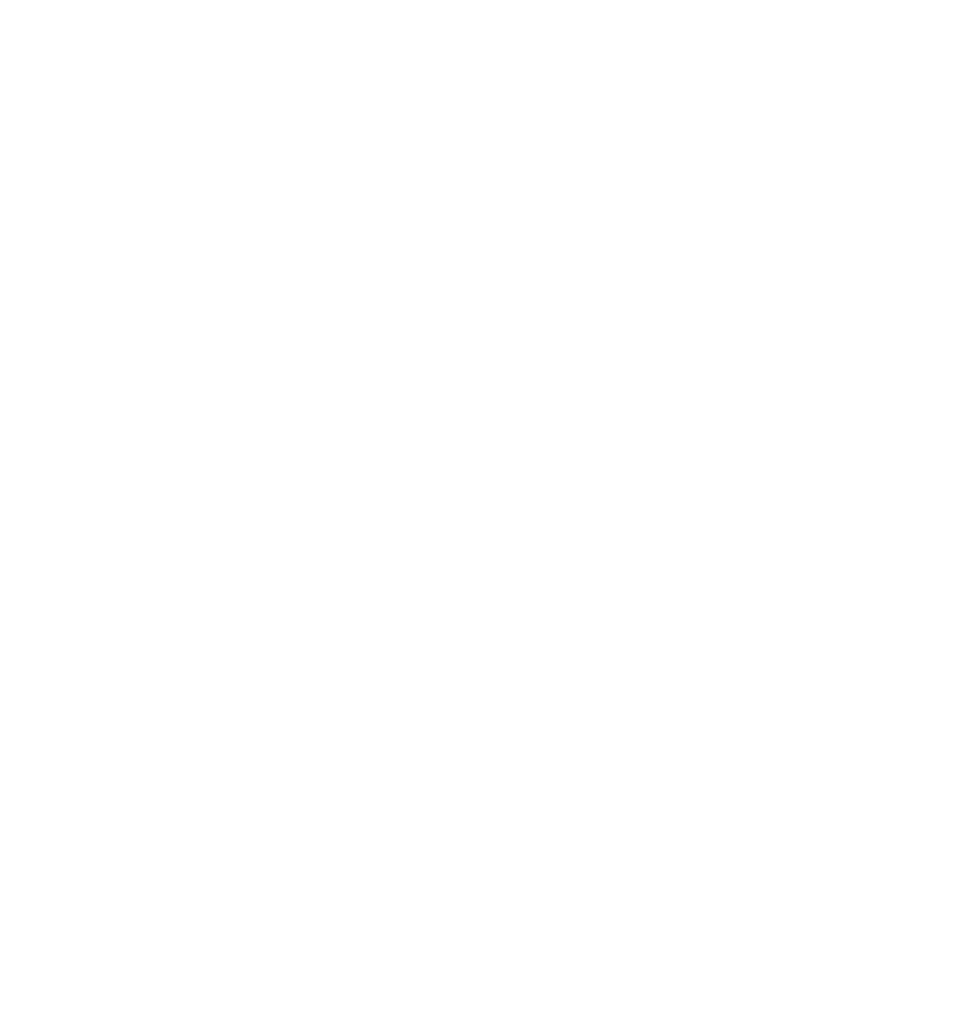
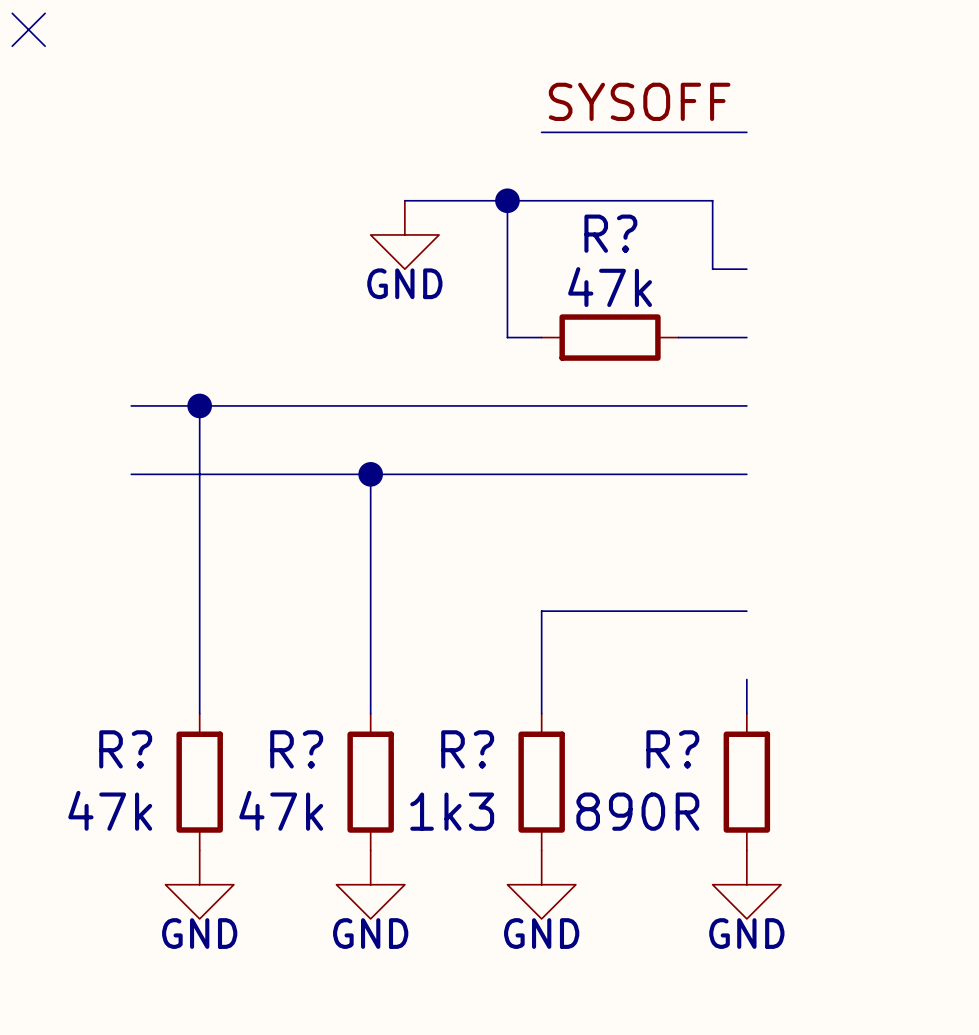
no-connect mark: none -> (28, 29)
label: none -> SYSOFF (639, 101)
wire: none -> (541, 132) (746, 132)
wire: none -> (404, 200) (712, 200) (712, 269) (746, 269)
wire: none -> (507, 200) (507, 337) (541, 337)
junction: none -> (507, 200)
power symbol: none -> GND (404, 234)
R?: none -> 47k (610, 337)
wire: none -> (678, 337) (746, 337)
wire: none -> (131, 405) (746, 405)
wire: none -> (199, 405) (199, 713)
junction: none -> (199, 405)
wire: none -> (131, 474) (746, 474)
wire: none -> (370, 474) (370, 713)
junction: none -> (370, 474)
wire: none -> (746, 611) (541, 611) (541, 713)
wire: none -> (746, 679) (746, 713)
R?: none -> 47k (199, 782)
R?: none -> 47k (370, 782)
R?: none -> 1k3 (541, 782)
R?: none -> 890R (746, 782)
power symbol: none -> GND (199, 884)
power symbol: none -> GND (370, 884)
power symbol: none -> GND (541, 884)
power symbol: none -> GND (746, 884)

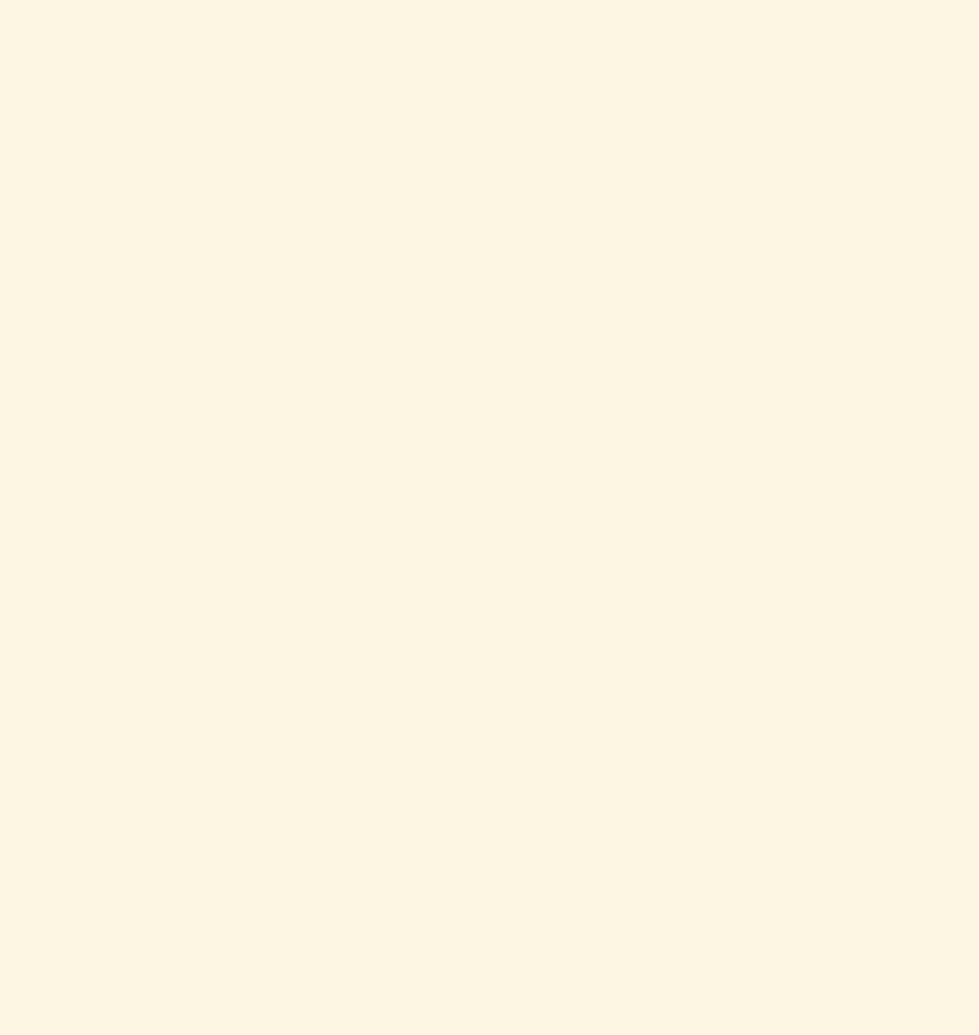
no-connect mark: (28, 29) -> none
label: SYSOFF (639, 101) -> none
wire: (541, 132) (746, 132) -> none
wire: (404, 200) (712, 200) (712, 269) (746, 269) -> none
wire: (507, 200) (507, 337) (541, 337) -> none
junction: (507, 200) -> none
power symbol: GND (404, 234) -> none
R?: 47k (610, 337) -> none
wire: (678, 337) (746, 337) -> none
wire: (131, 405) (746, 405) -> none
wire: (199, 405) (199, 713) -> none
junction: (199, 405) -> none
wire: (131, 474) (746, 474) -> none
wire: (370, 474) (370, 713) -> none
junction: (370, 474) -> none
wire: (746, 611) (541, 611) (541, 713) -> none
wire: (746, 679) (746, 713) -> none
R?: 47k (199, 782) -> none
R?: 47k (370, 782) -> none
R?: 1k3 (541, 782) -> none
R?: 890R (746, 782) -> none
power symbol: GND (199, 884) -> none
power symbol: GND (370, 884) -> none
power symbol: GND (541, 884) -> none
power symbol: GND (746, 884) -> none

